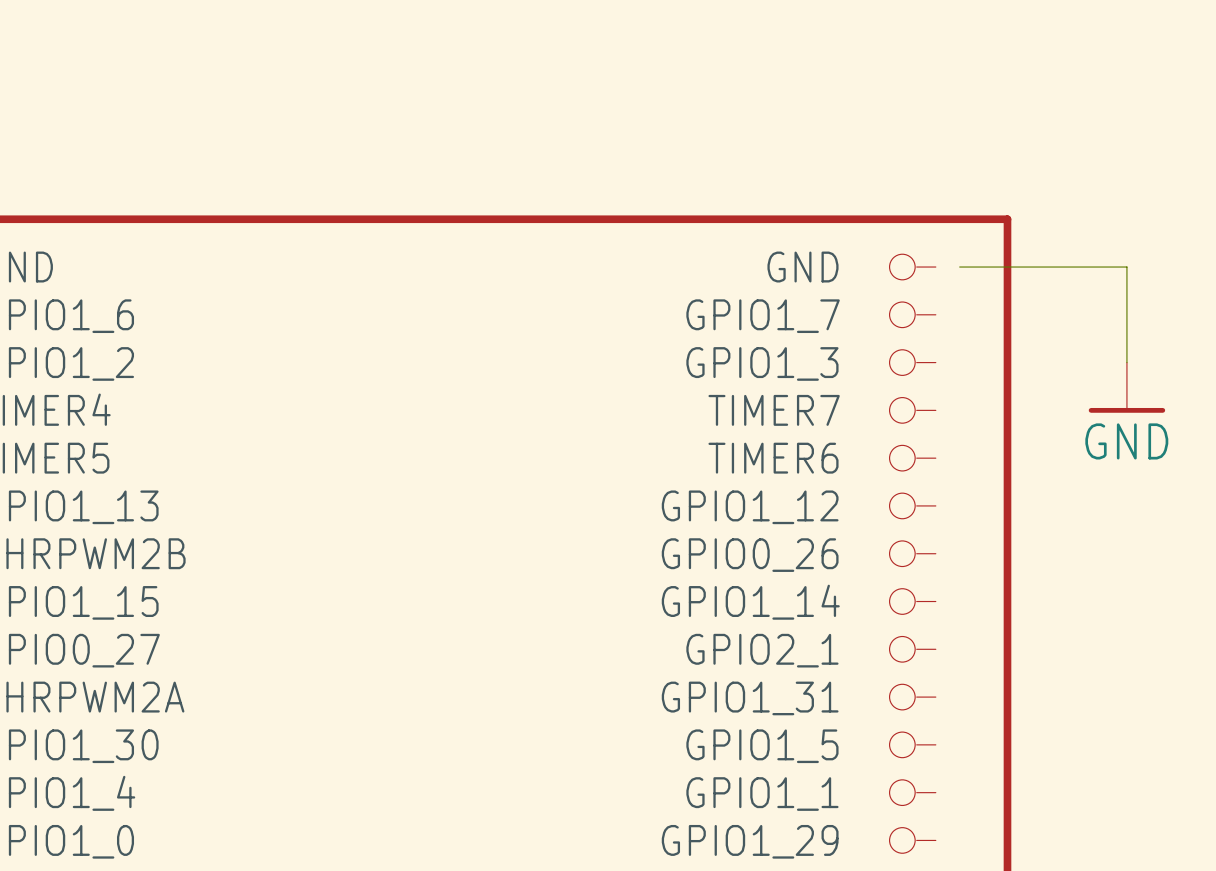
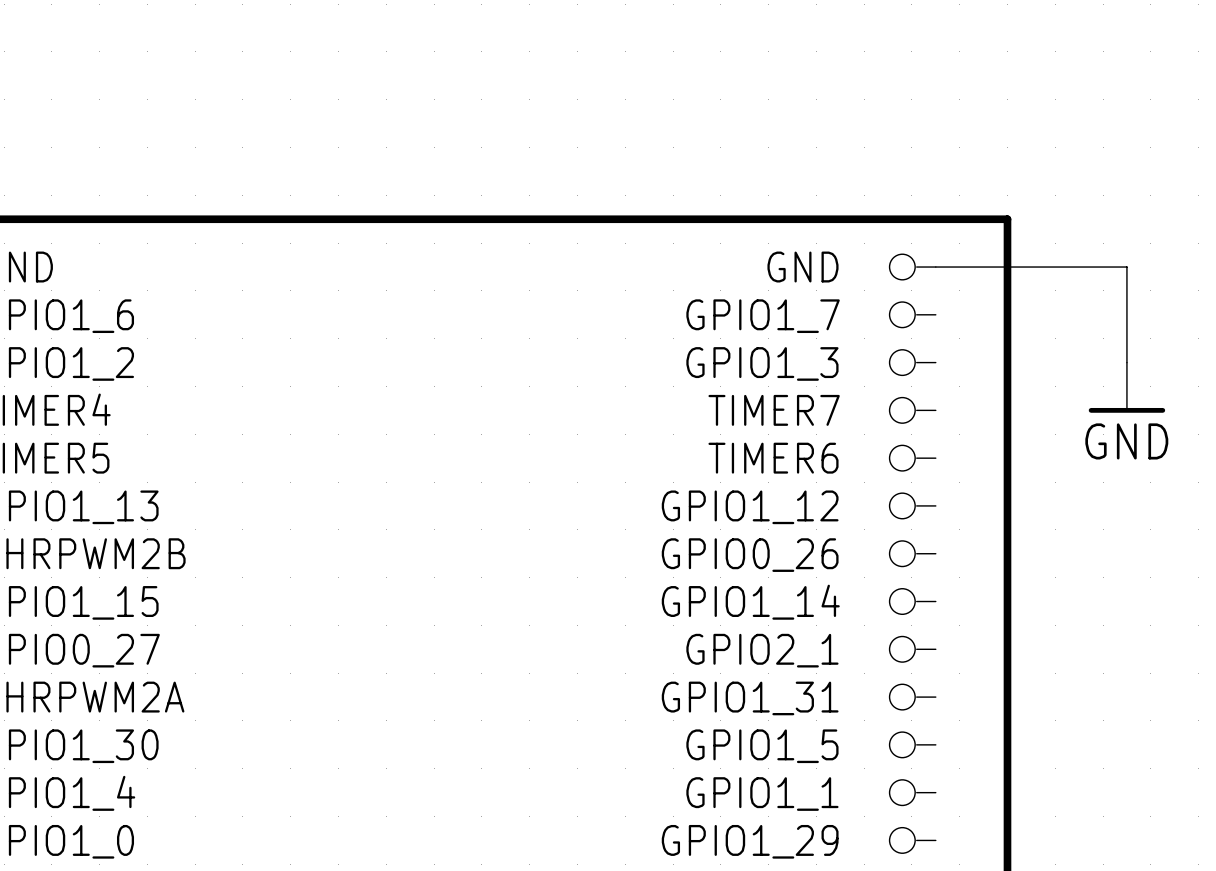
wire: none -> (935, 267) (959, 267)

